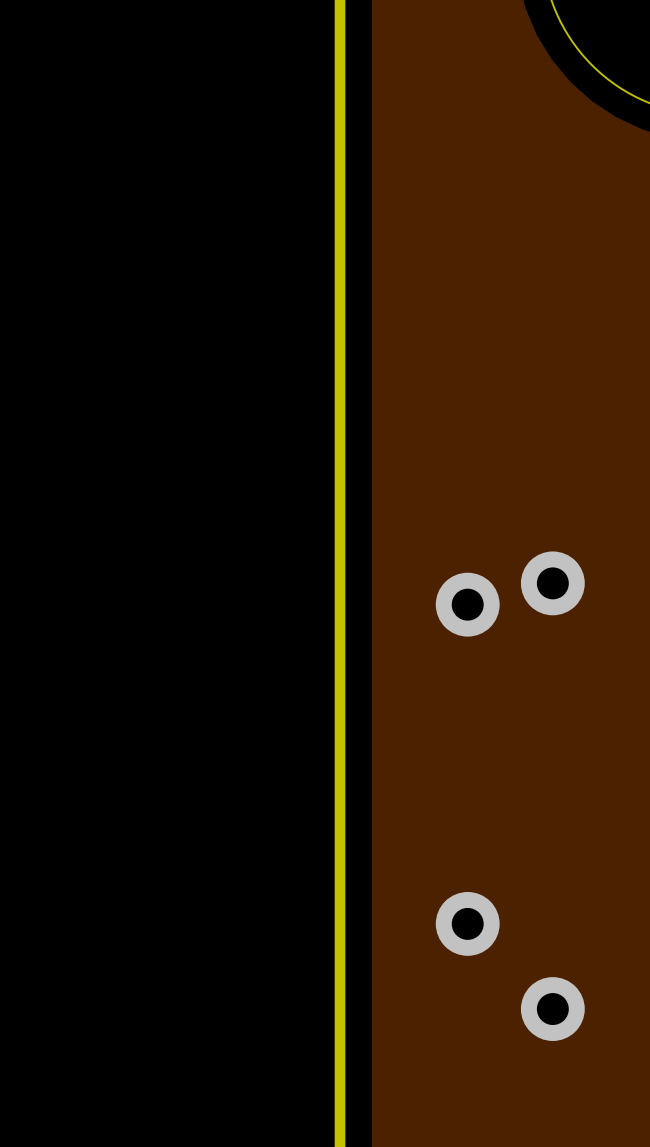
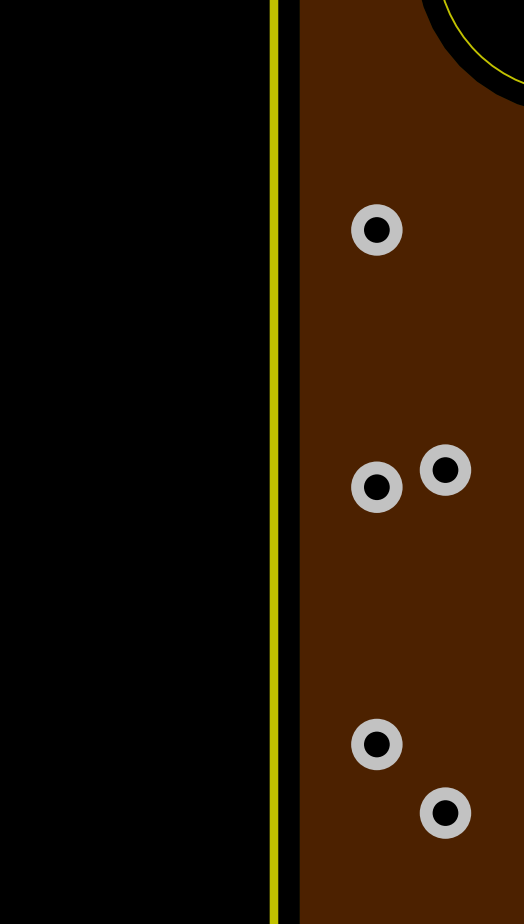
via: none -> (376, 229)

